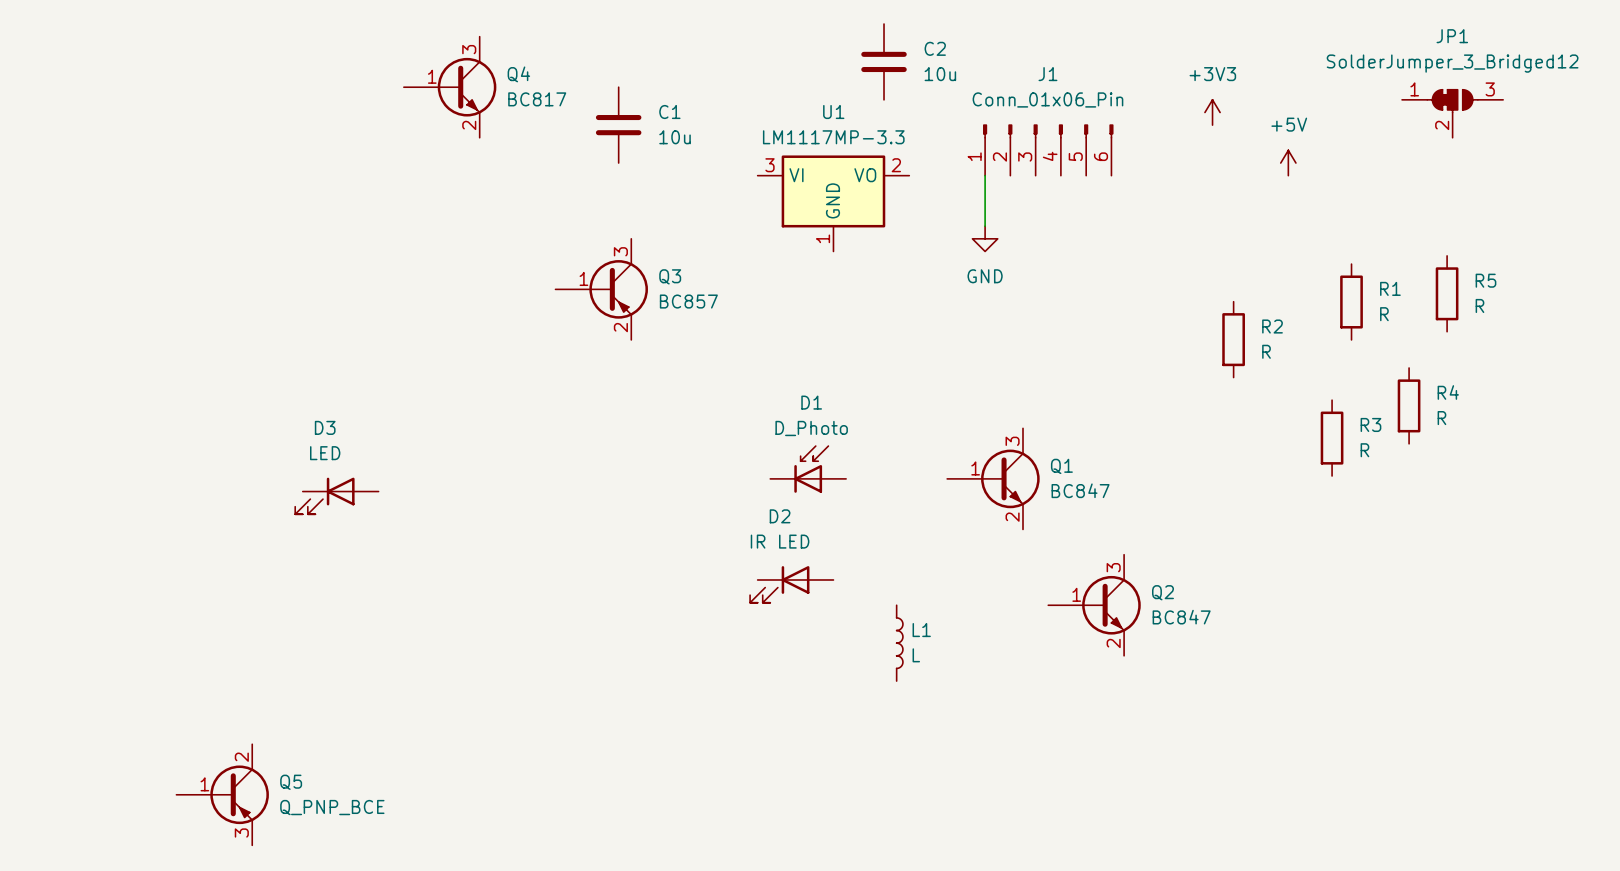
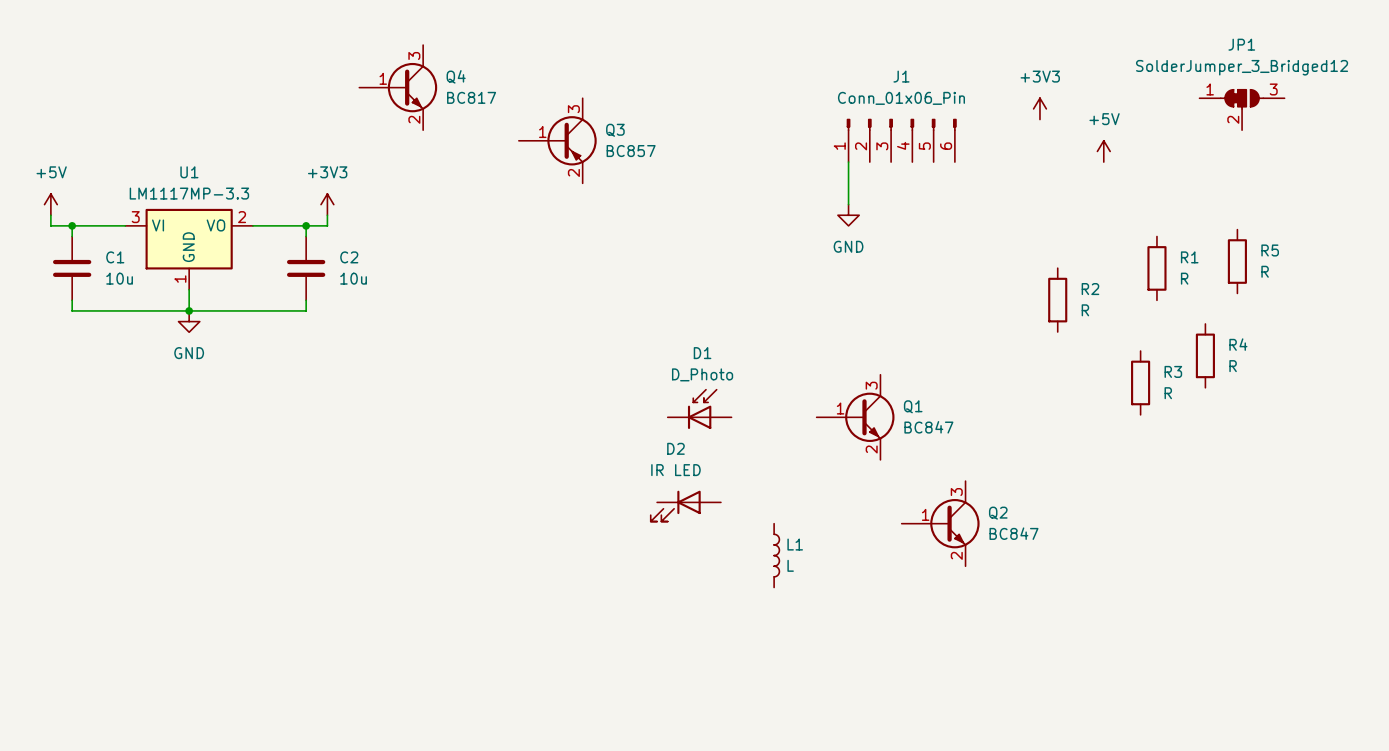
C2 position: (884, 61) -> (306, 268)
C1 position: (618, 125) -> (72, 268)
U1 position: (833, 203) -> (189, 249)
power symbol: none -> +5V (50, 204)
power symbol: none -> +3V3 (327, 204)
wire: none -> (50, 215) (50, 225) (125, 225)
wire: none -> (327, 215) (327, 225) (252, 225)
wire: none -> (72, 225) (72, 236)
junction: none -> (72, 225)
wire: none -> (306, 225) (306, 236)
junction: none -> (306, 225)
Q3 position: (601, 289) -> (557, 140)
wire: none -> (189, 289) (189, 310)
wire: none -> (72, 300) (72, 310) (306, 310) (306, 300)
junction: none -> (189, 310)
power symbol: none -> GND (189, 321)
D3: LED (336, 495) -> none
Q5: Q_PNP_BCE (222, 794) -> none

